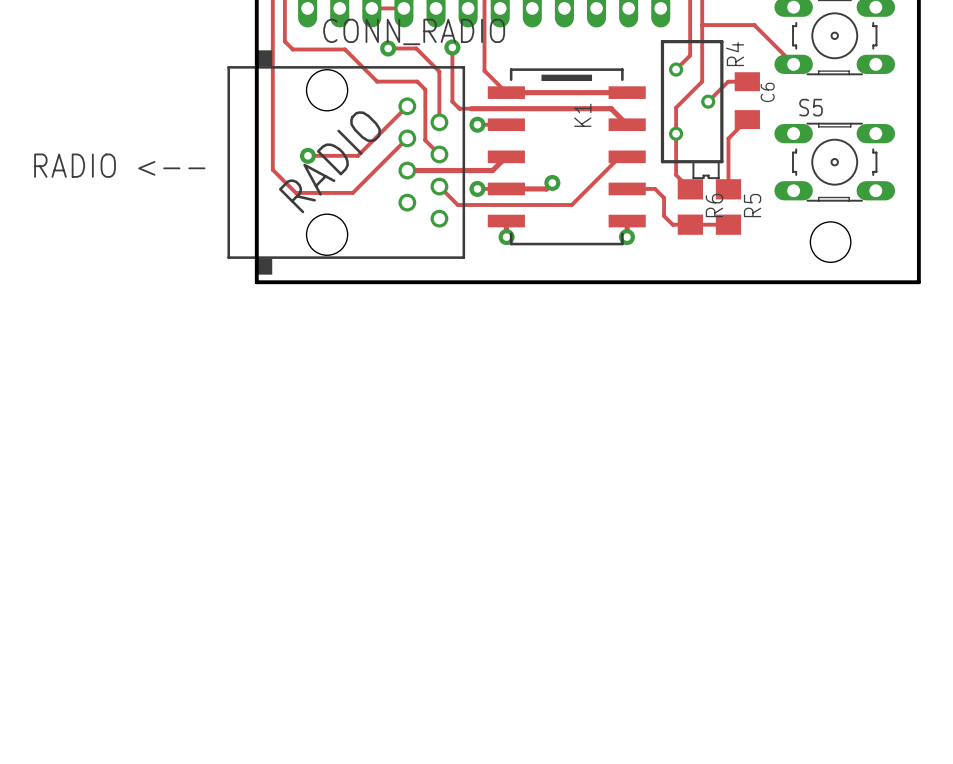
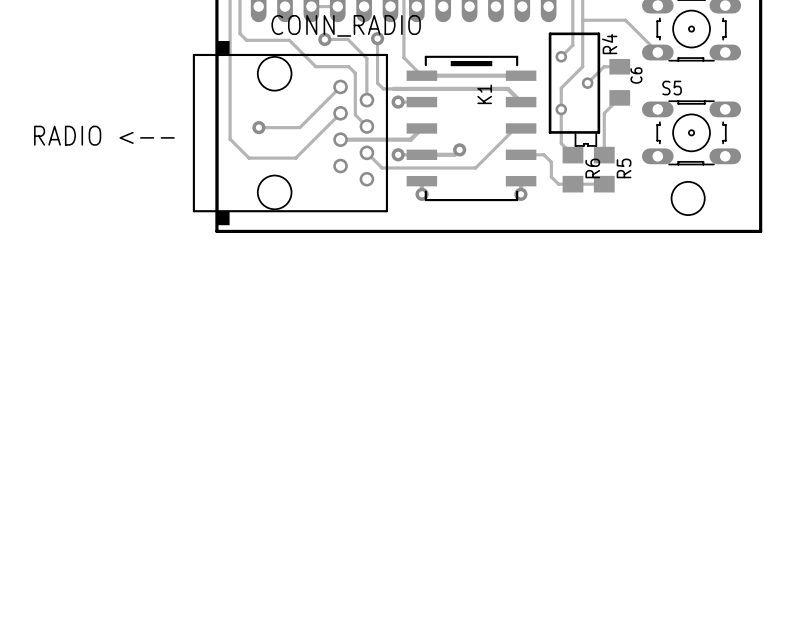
text: RADIO (329, 162) -> none

